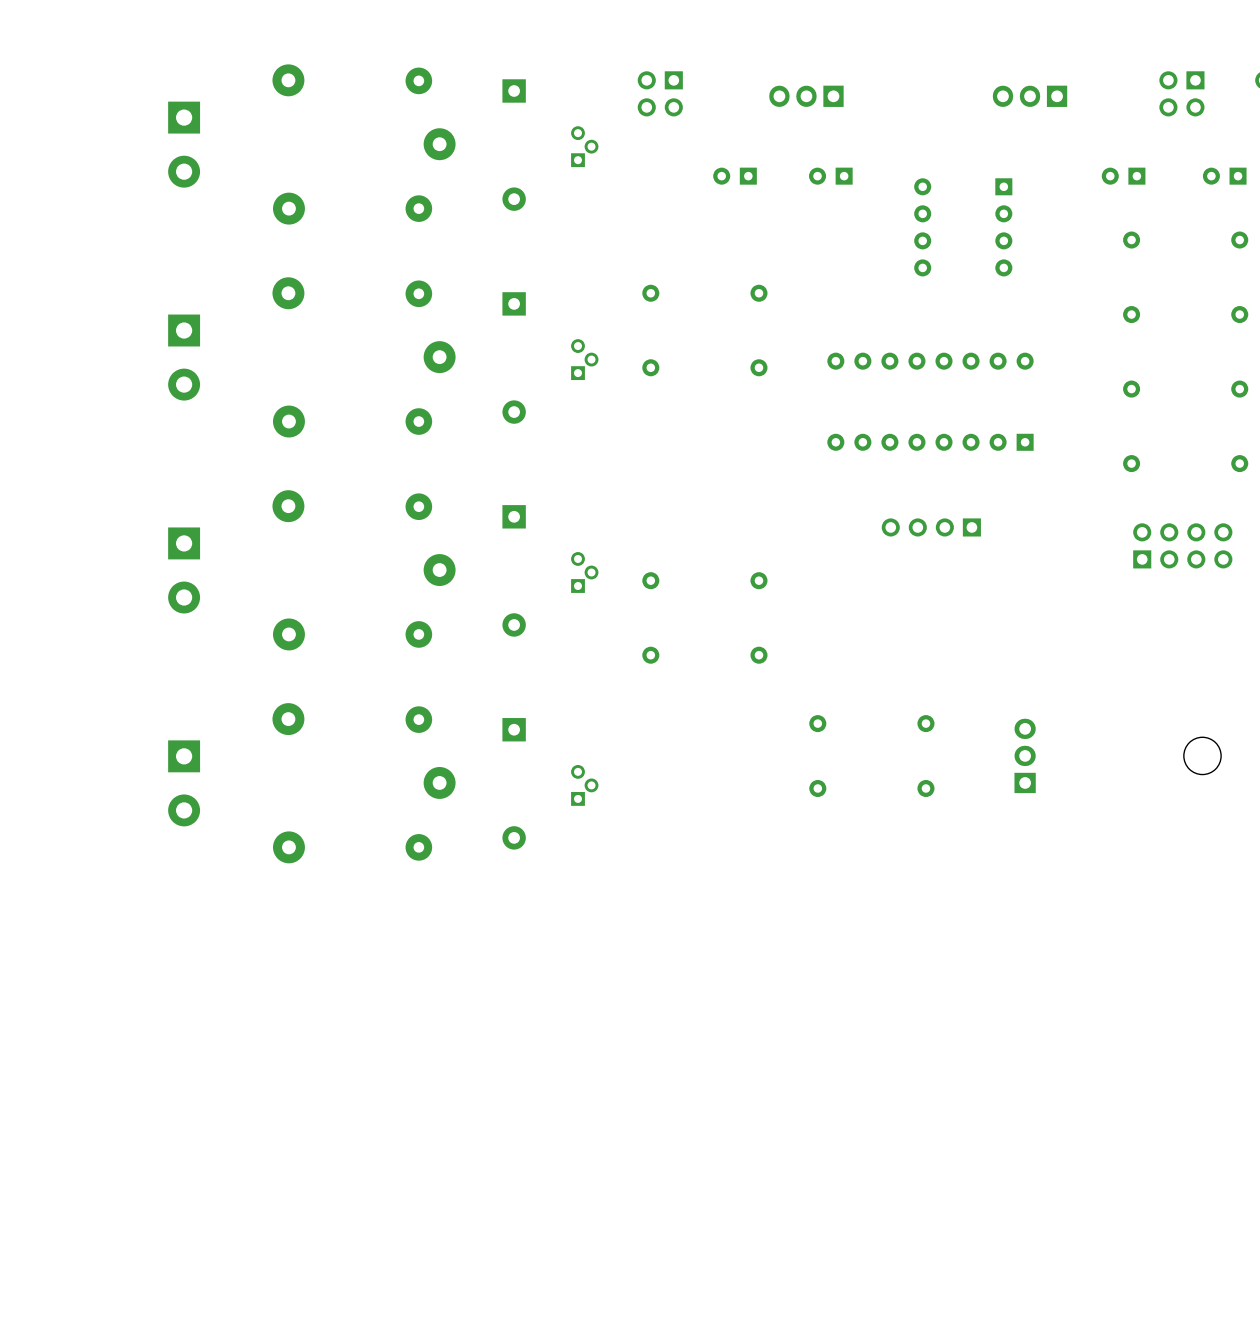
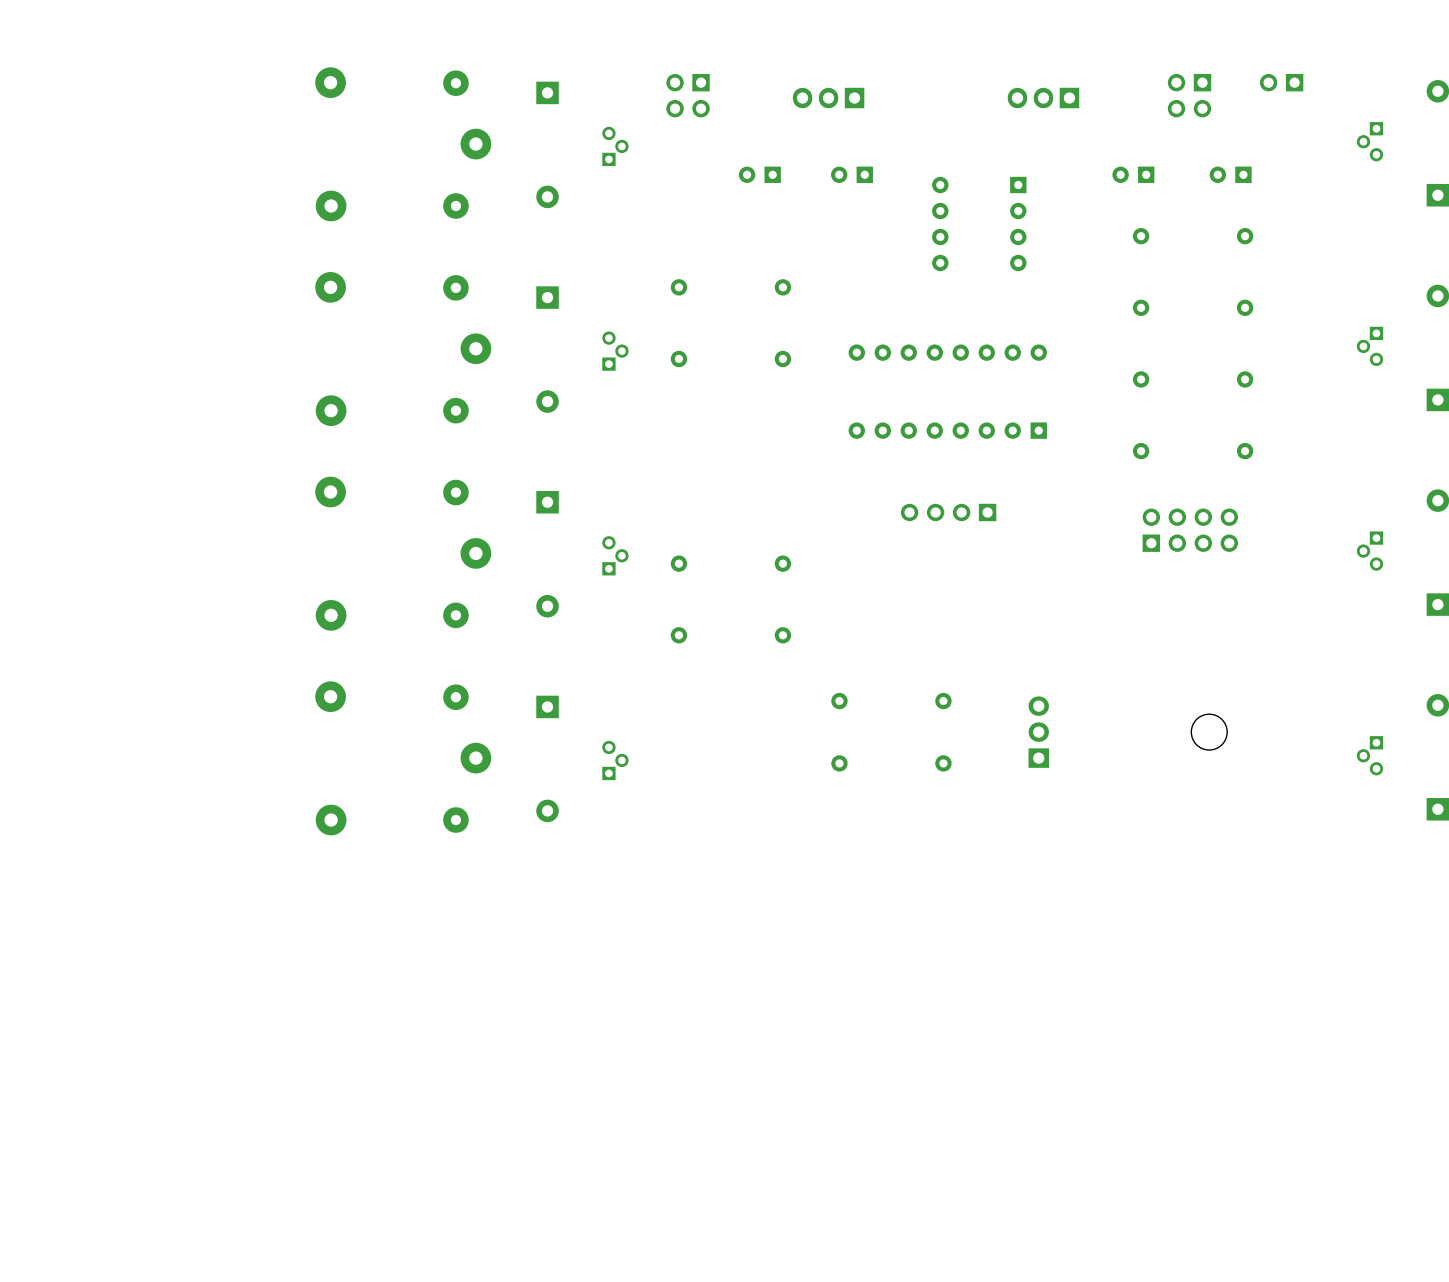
part: (184, 144) -> none
part: (184, 357) -> none
part: (184, 570) -> none
part: (184, 783) -> none

